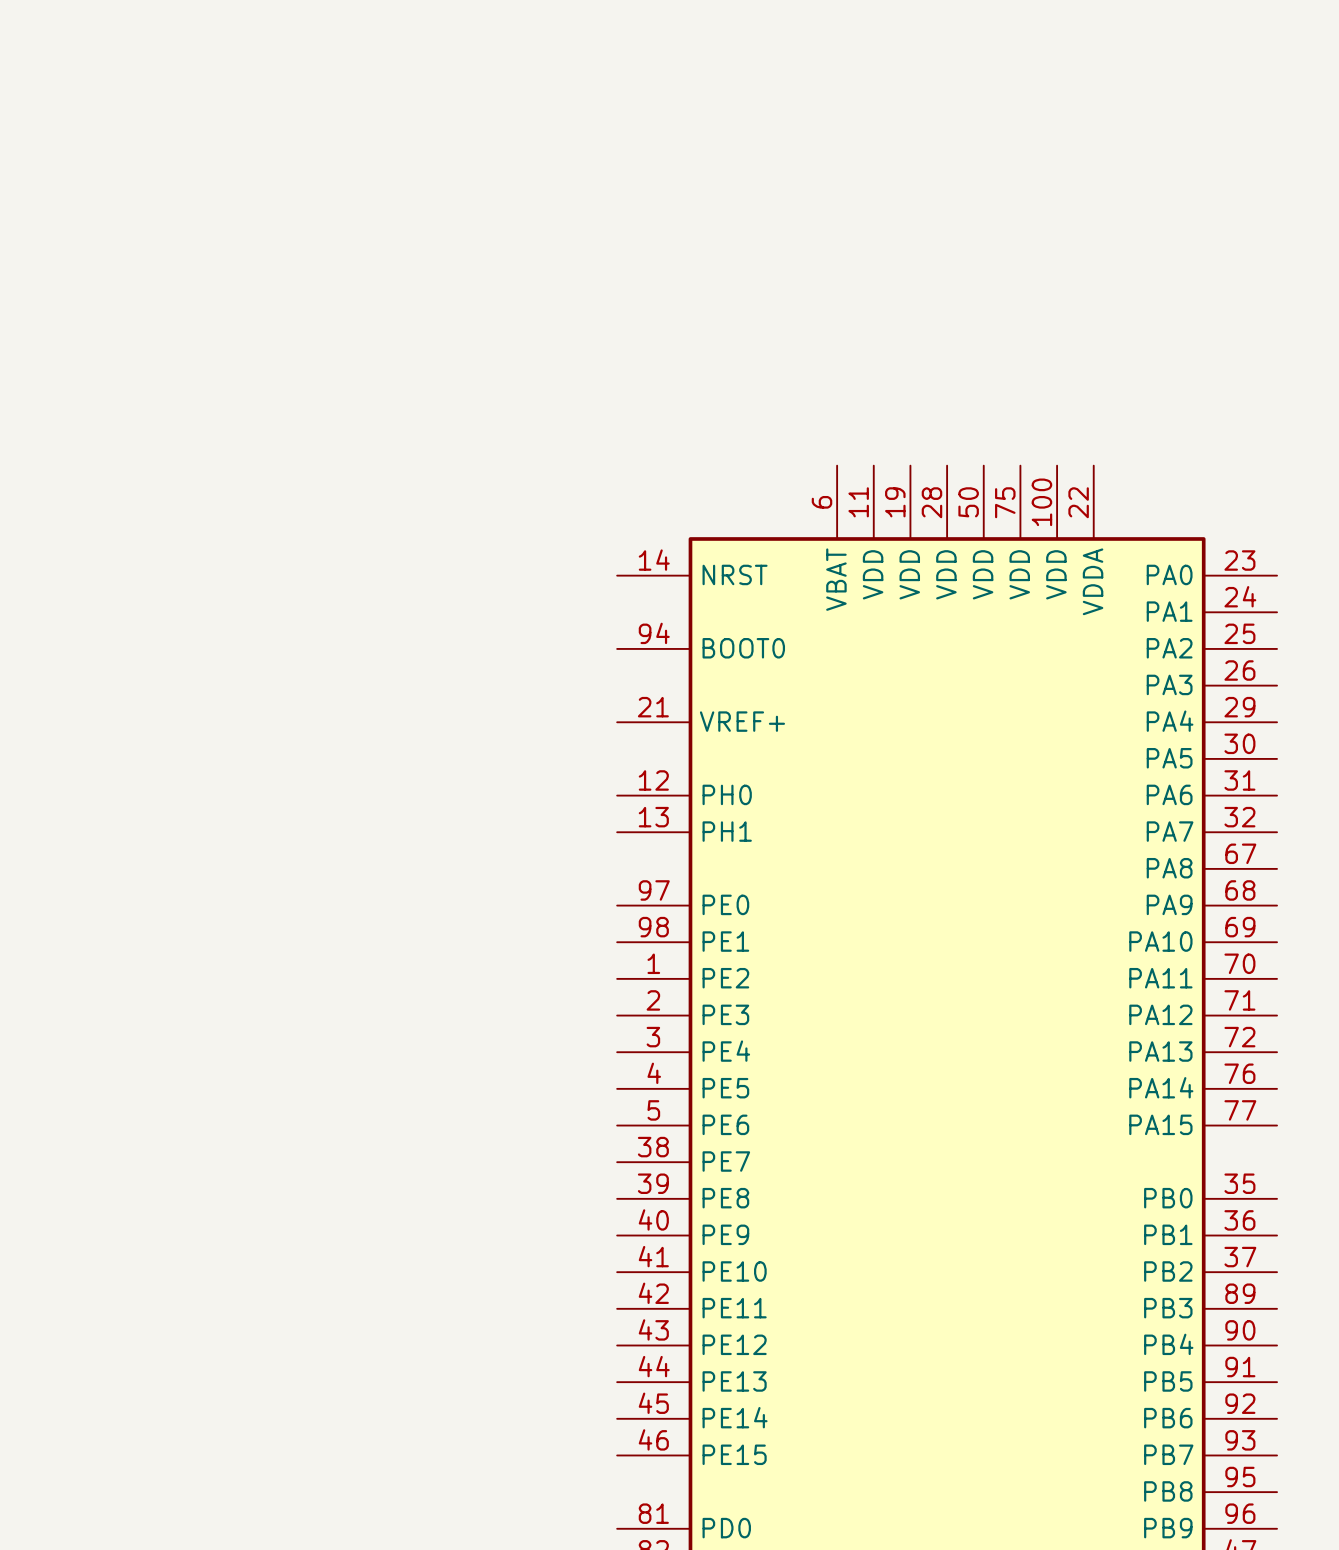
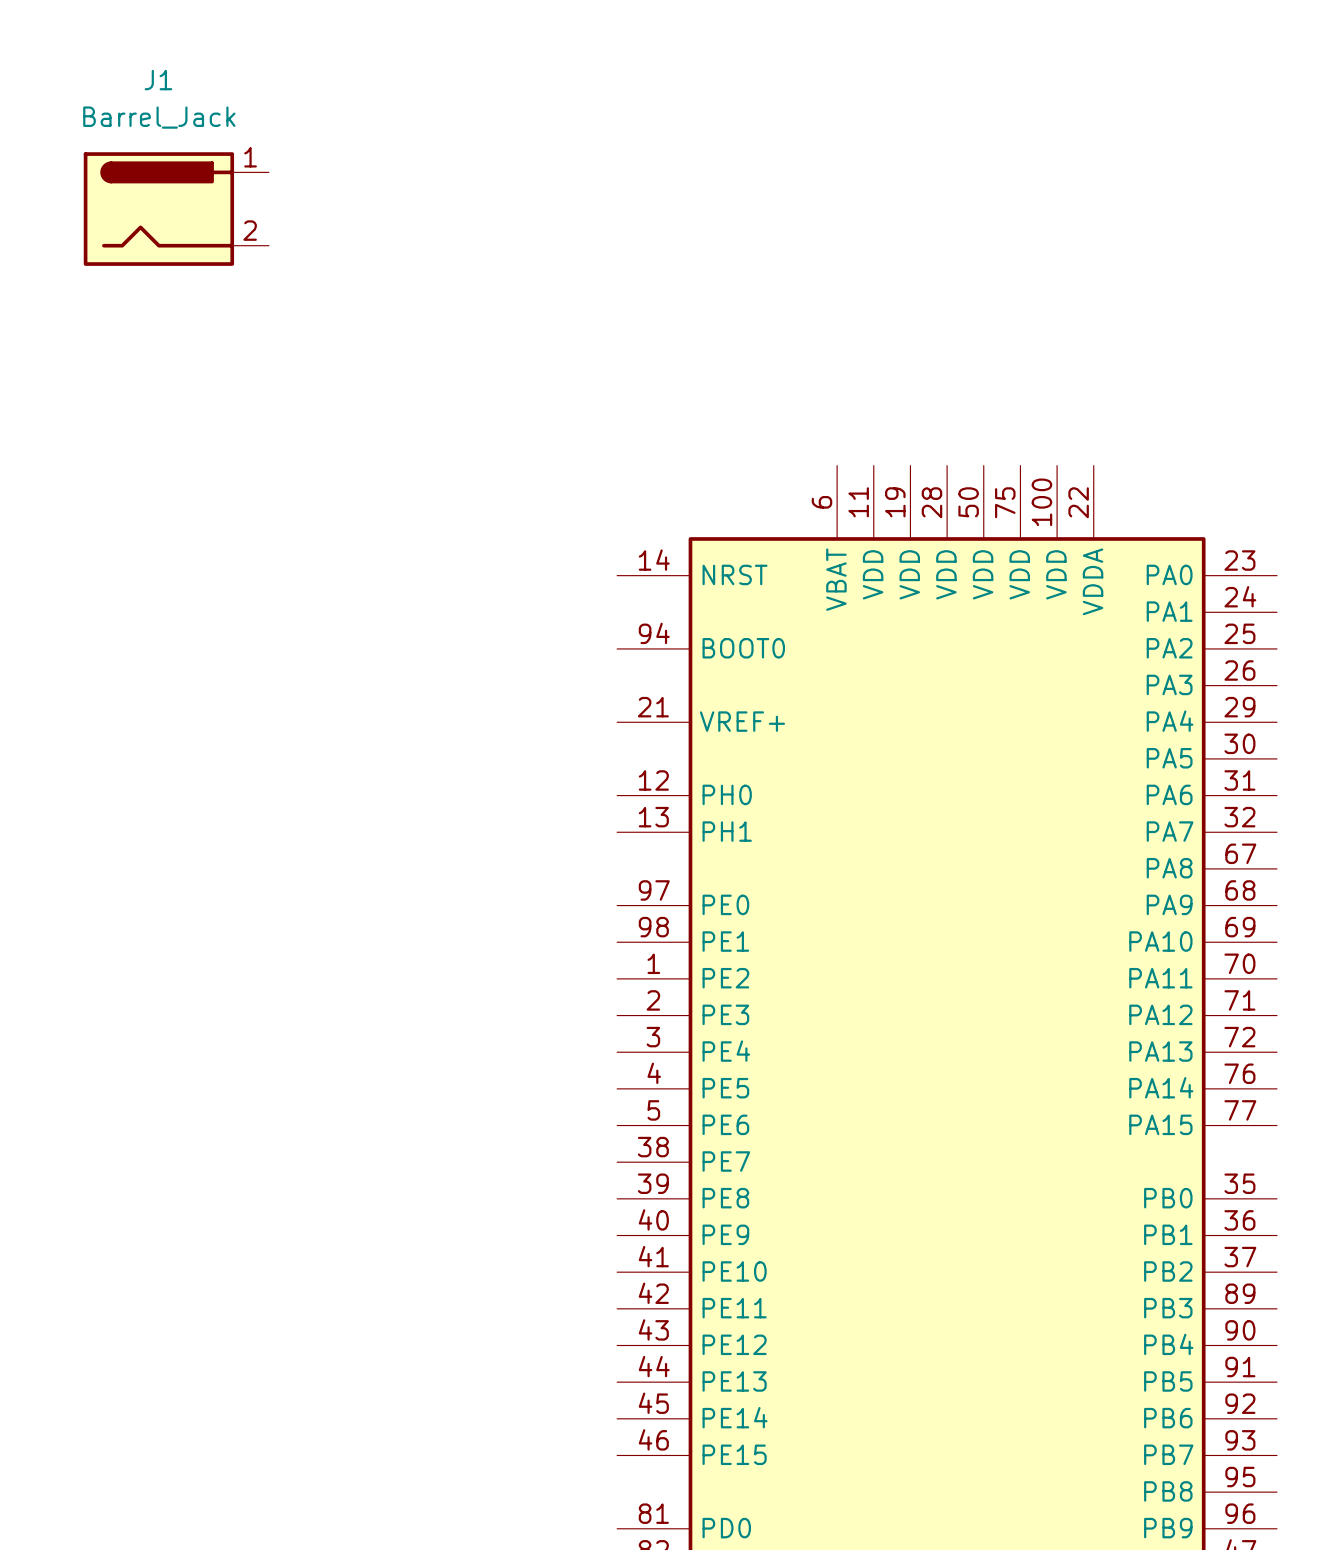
J1: none -> Barrel_Jack (176, 209)

